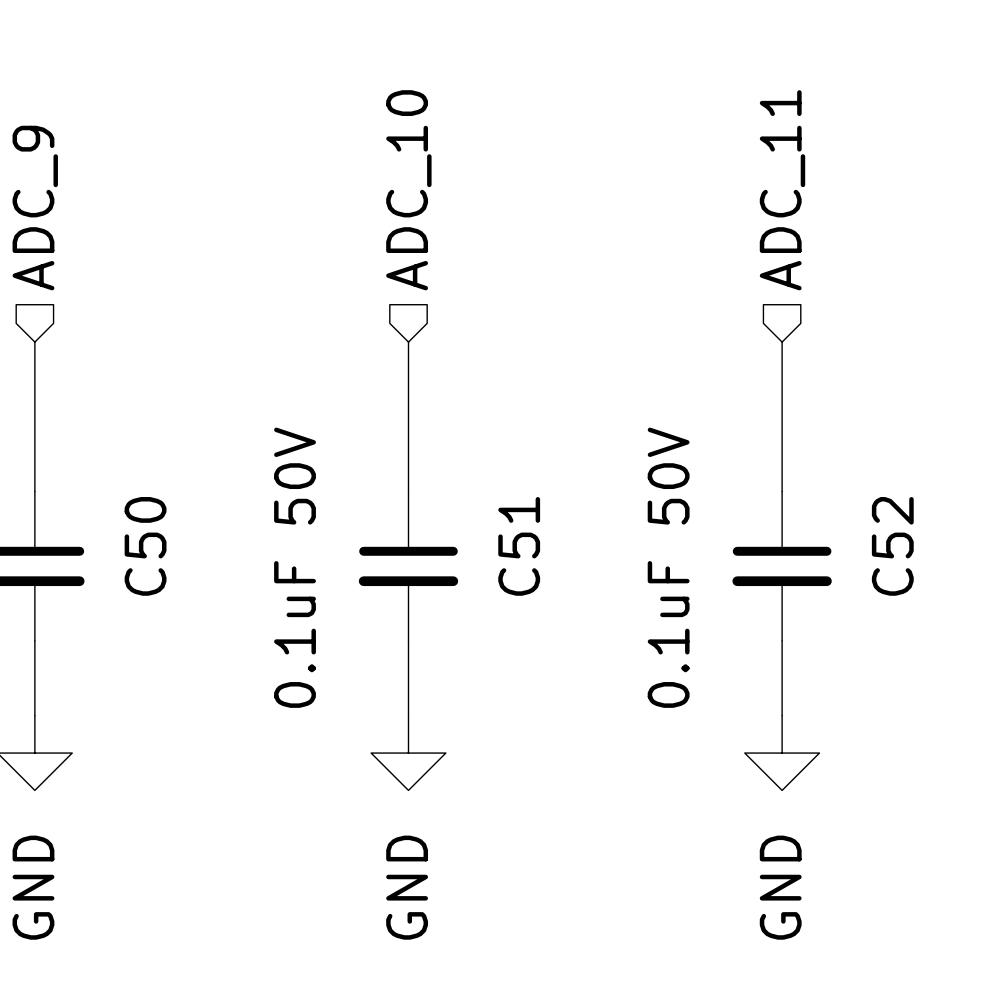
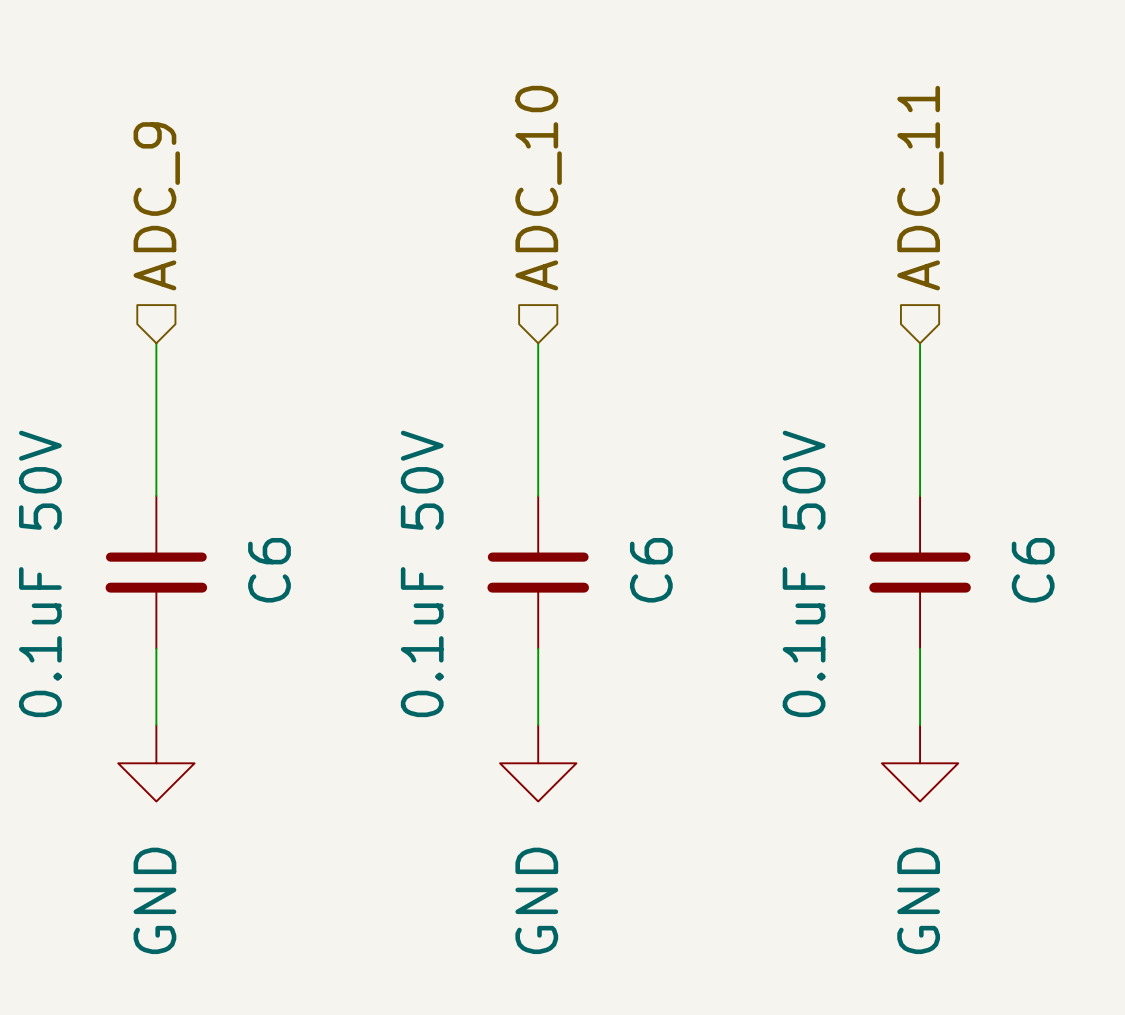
C50 name: C50 (145, 546) -> C6 (269, 570)
C51 name: C51 (519, 546) -> C6 (651, 570)
C52 name: C52 (892, 546) -> C6 (1033, 570)

